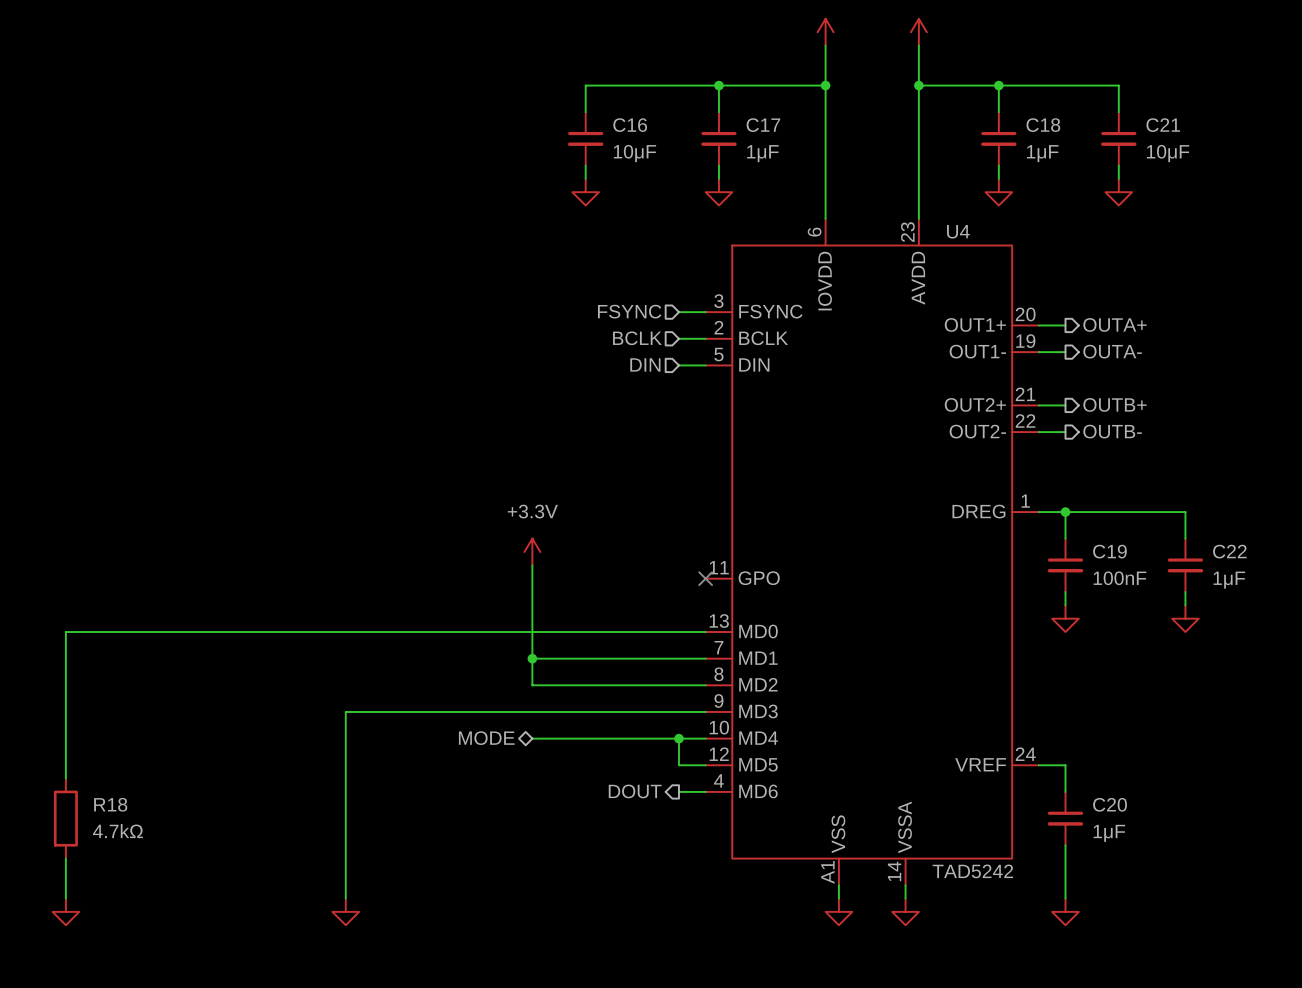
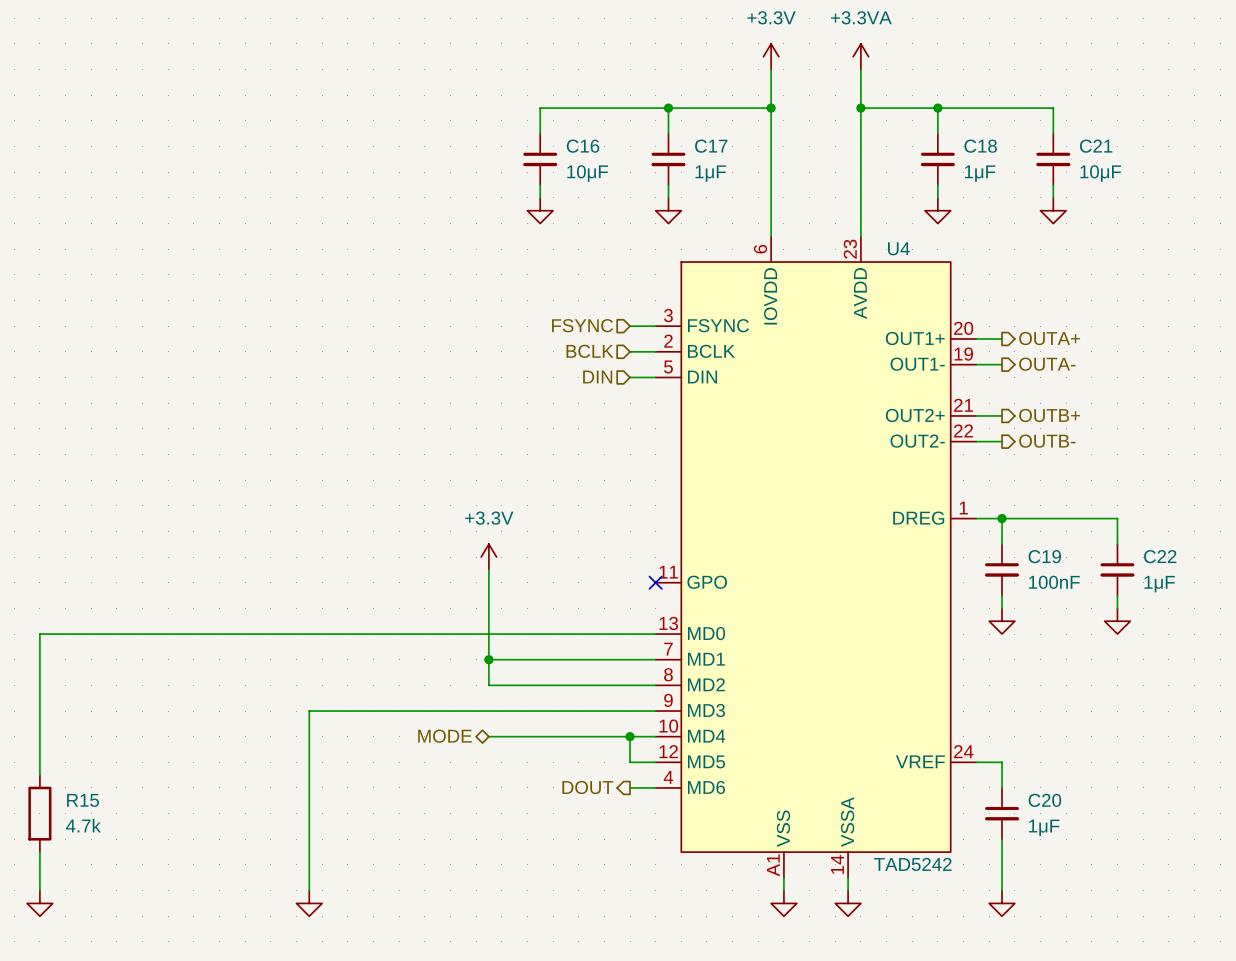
R18 name: R18 (110, 804) -> R15 (83, 800)
R18 value: 4.7kΩ (117, 831) -> 4.7k (83, 825)

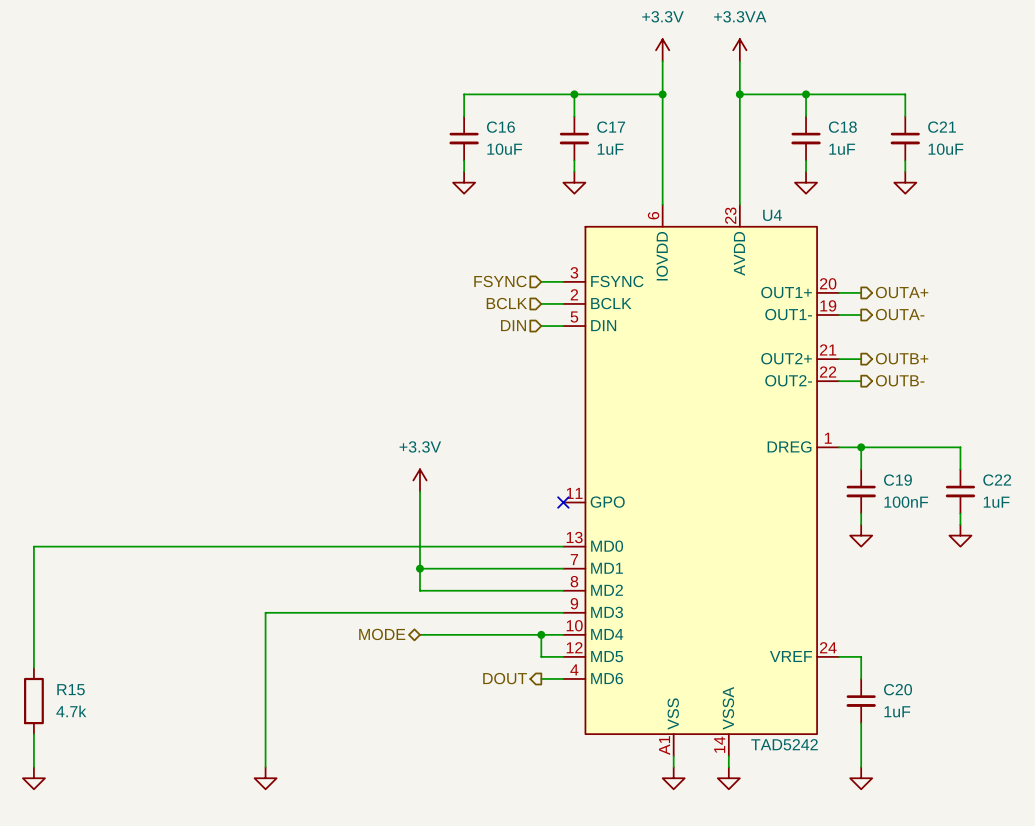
C16 value: 10μF (587, 173) -> 10uF (504, 149)
C17 value: 1μF (710, 173) -> 1uF (610, 149)
C18 value: 1μF (980, 173) -> 1uF (842, 149)
C21 value: 10μF (1100, 173) -> 10uF (945, 149)
C22 value: 1μF (1159, 584) -> 1uF (996, 502)
C20 value: 1μF (1044, 827) -> 1uF (897, 711)

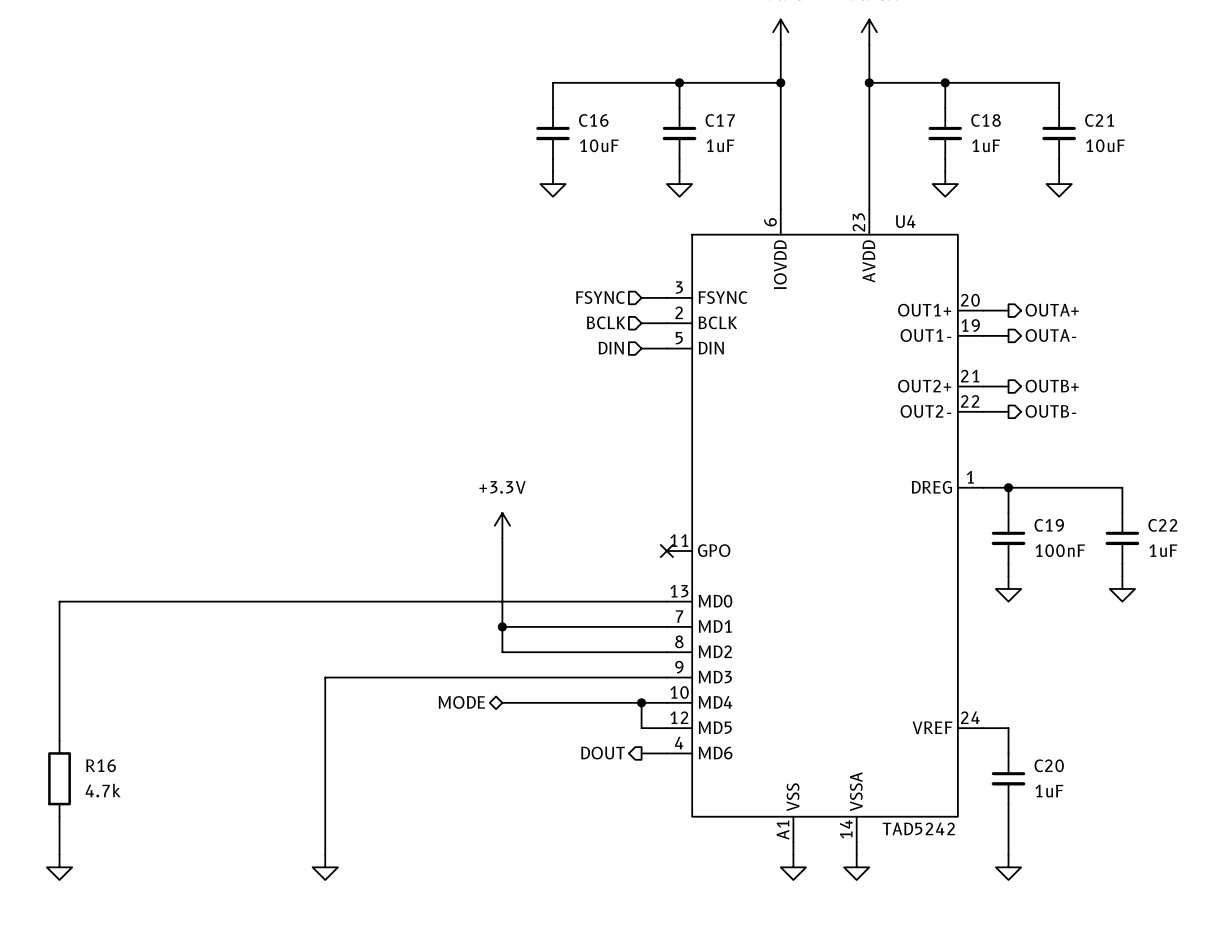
R15 name: R15 (71, 689) -> R16 (101, 765)

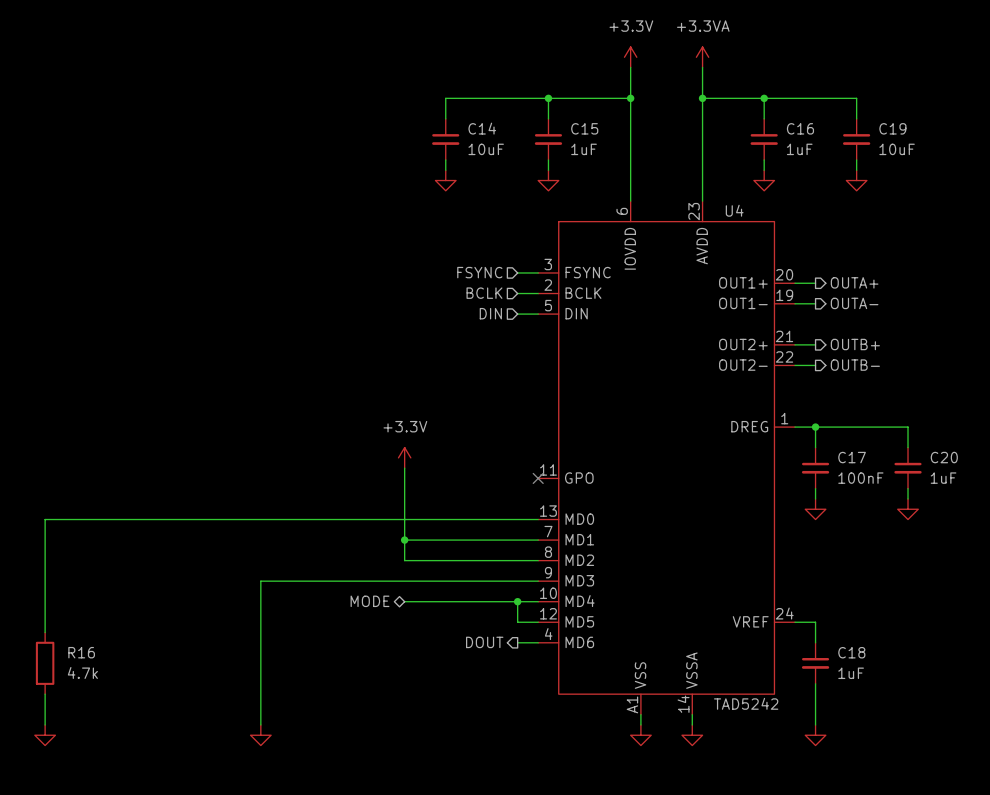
C16 name: C16 (593, 120) -> C14 (482, 128)
C17 name: C17 (720, 120) -> C15 (584, 128)
C18 name: C18 (986, 120) -> C16 (800, 128)
C21 name: C21 (1099, 120) -> C19 (892, 128)
C19 name: C19 (1049, 525) -> C17 (852, 457)
C22 name: C22 (1162, 525) -> C20 (944, 457)
C20 name: C20 (1049, 765) -> C18 (851, 652)

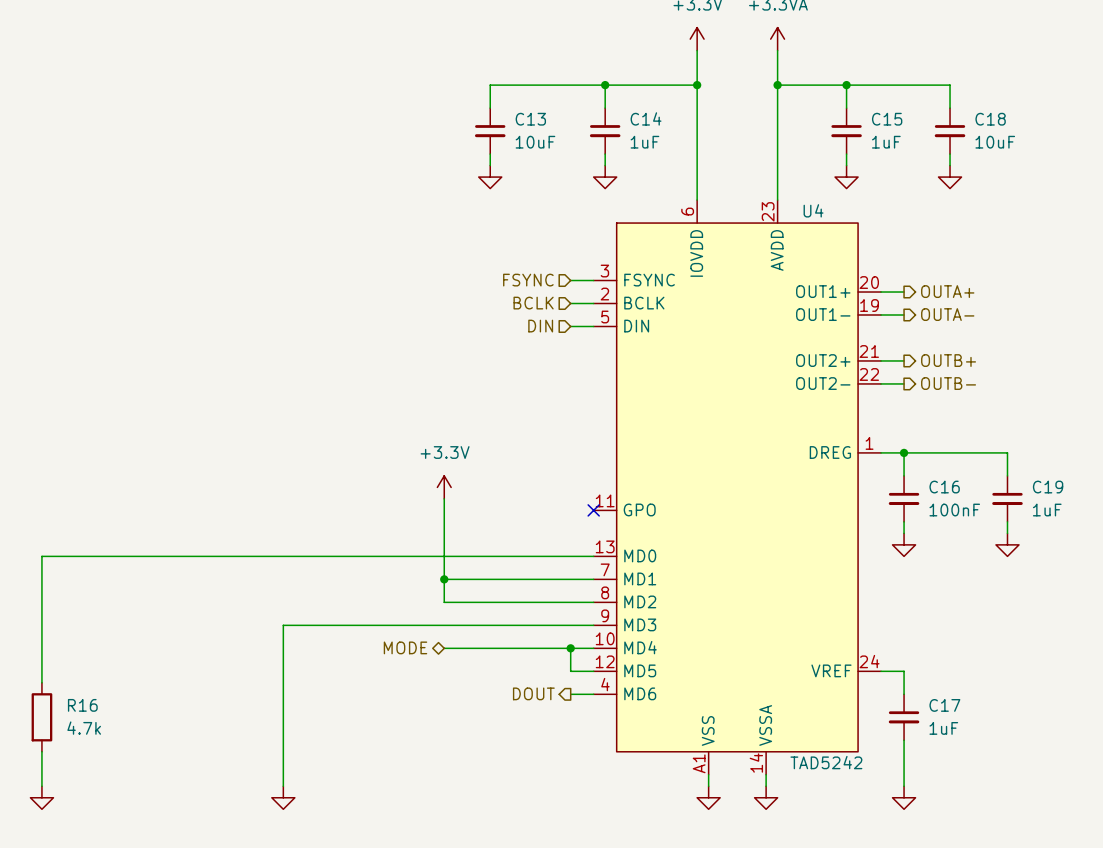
C14 name: C14 (482, 128) -> C13 (530, 119)
C15 name: C15 (584, 128) -> C14 (646, 118)
C16 name: C16 (800, 128) -> C15 (887, 119)
C19 name: C19 (892, 128) -> C18 (990, 119)
C17 name: C17 (852, 457) -> C16 (944, 487)
C20 name: C20 (944, 457) -> C19 (1048, 487)
C18 name: C18 (851, 652) -> C17 (944, 705)

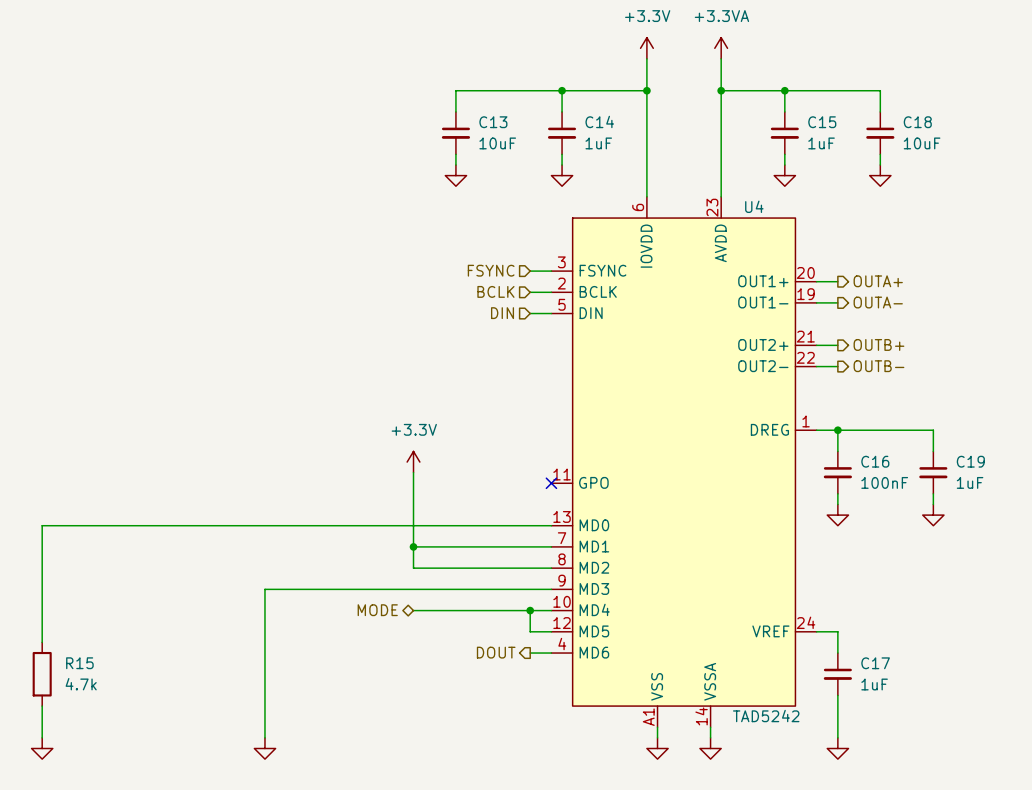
R16 name: R16 (82, 705) -> R15 (79, 663)

